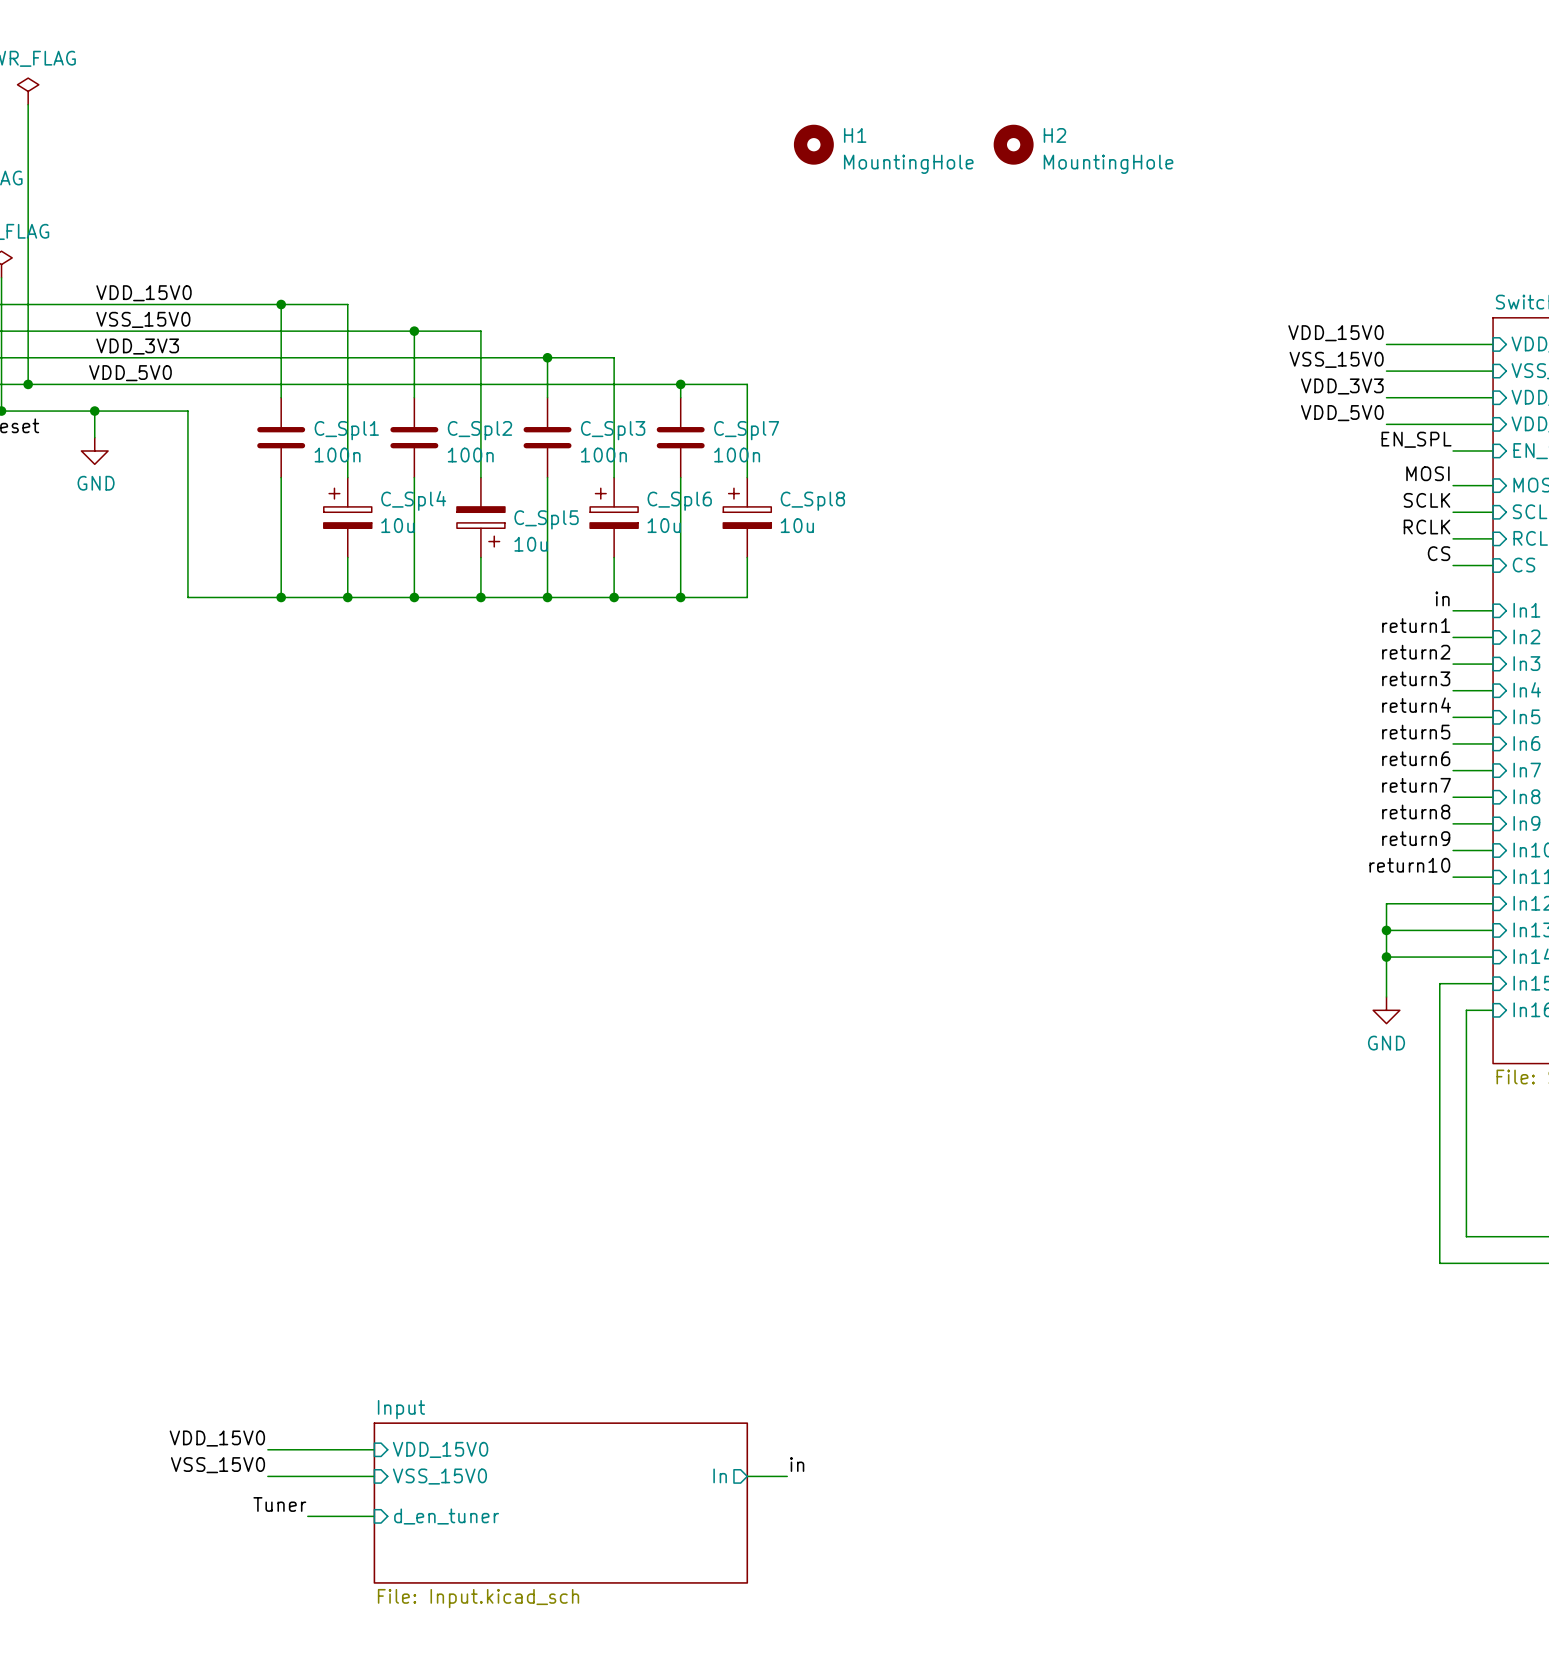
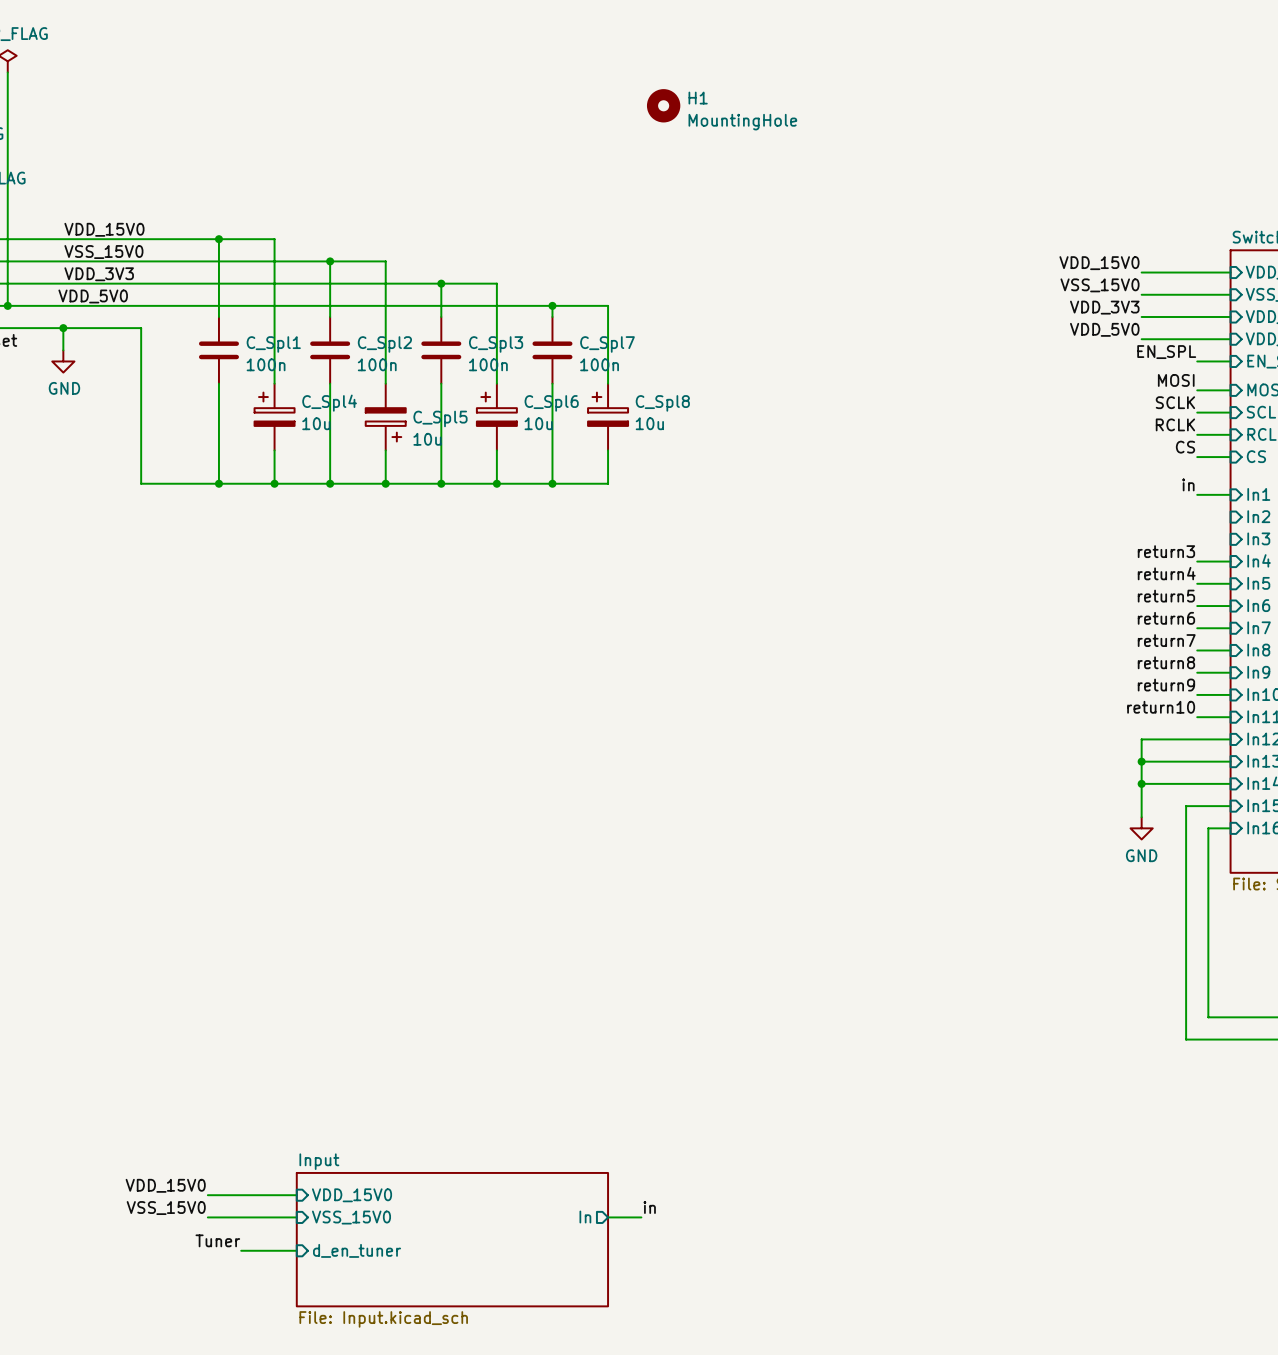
H2: MountingHole (1013, 144) -> none
label: return1 (1416, 625) -> none
wire: (1453, 637) (1493, 637) -> none
label: return2 (1416, 652) -> none
wire: (1453, 664) (1493, 664) -> none

